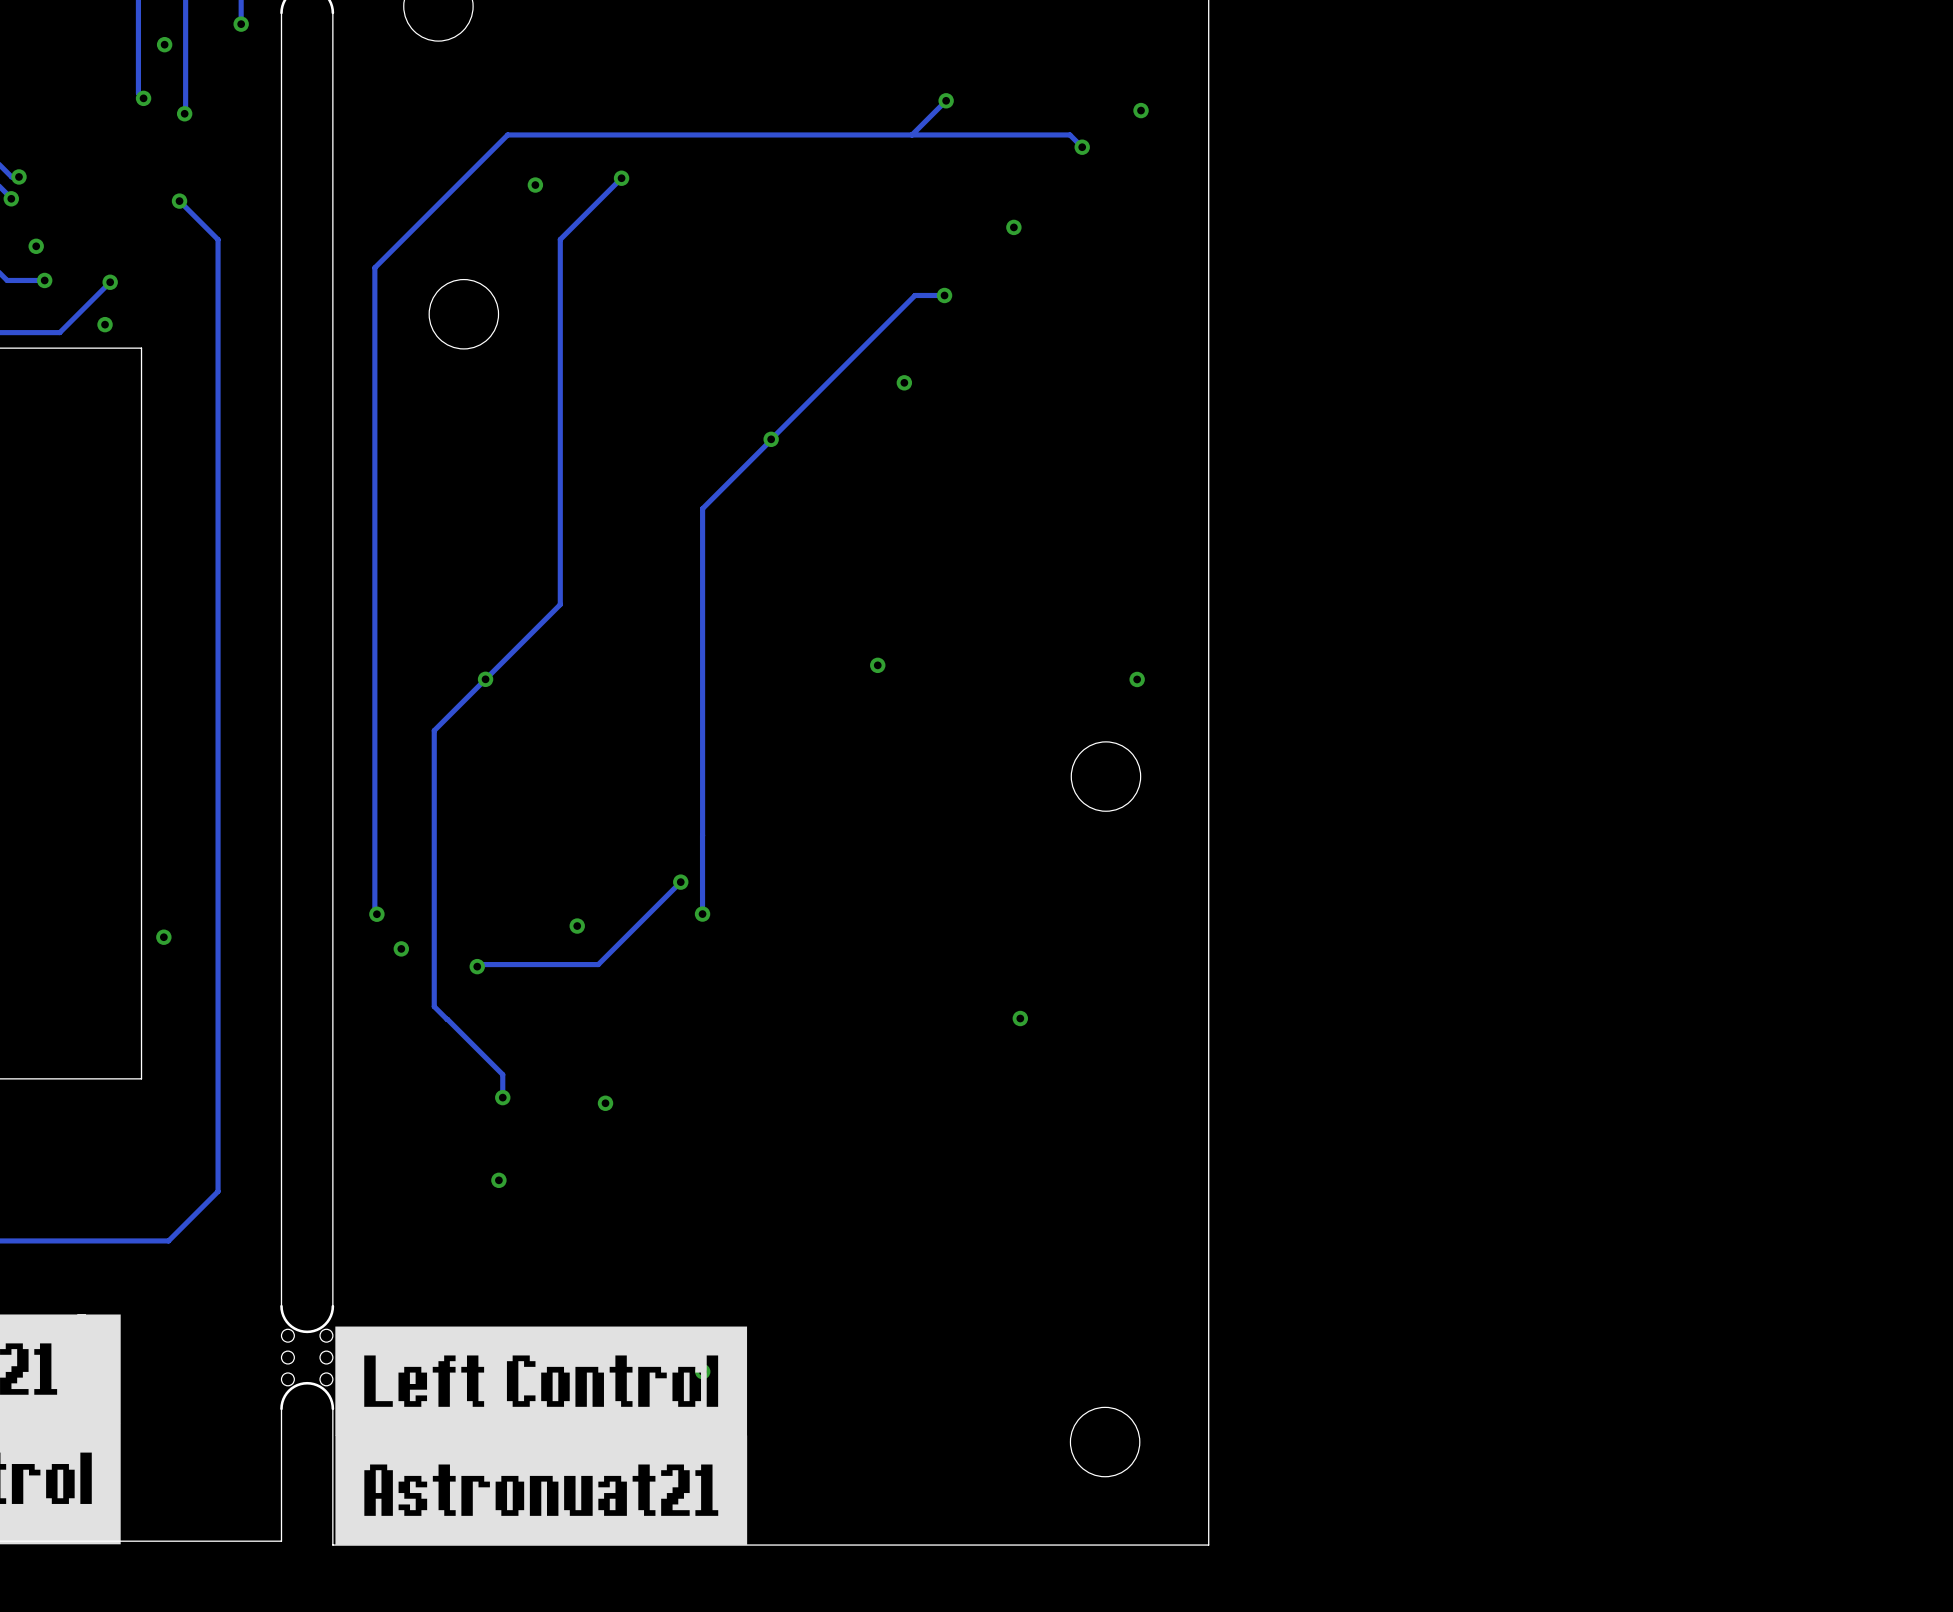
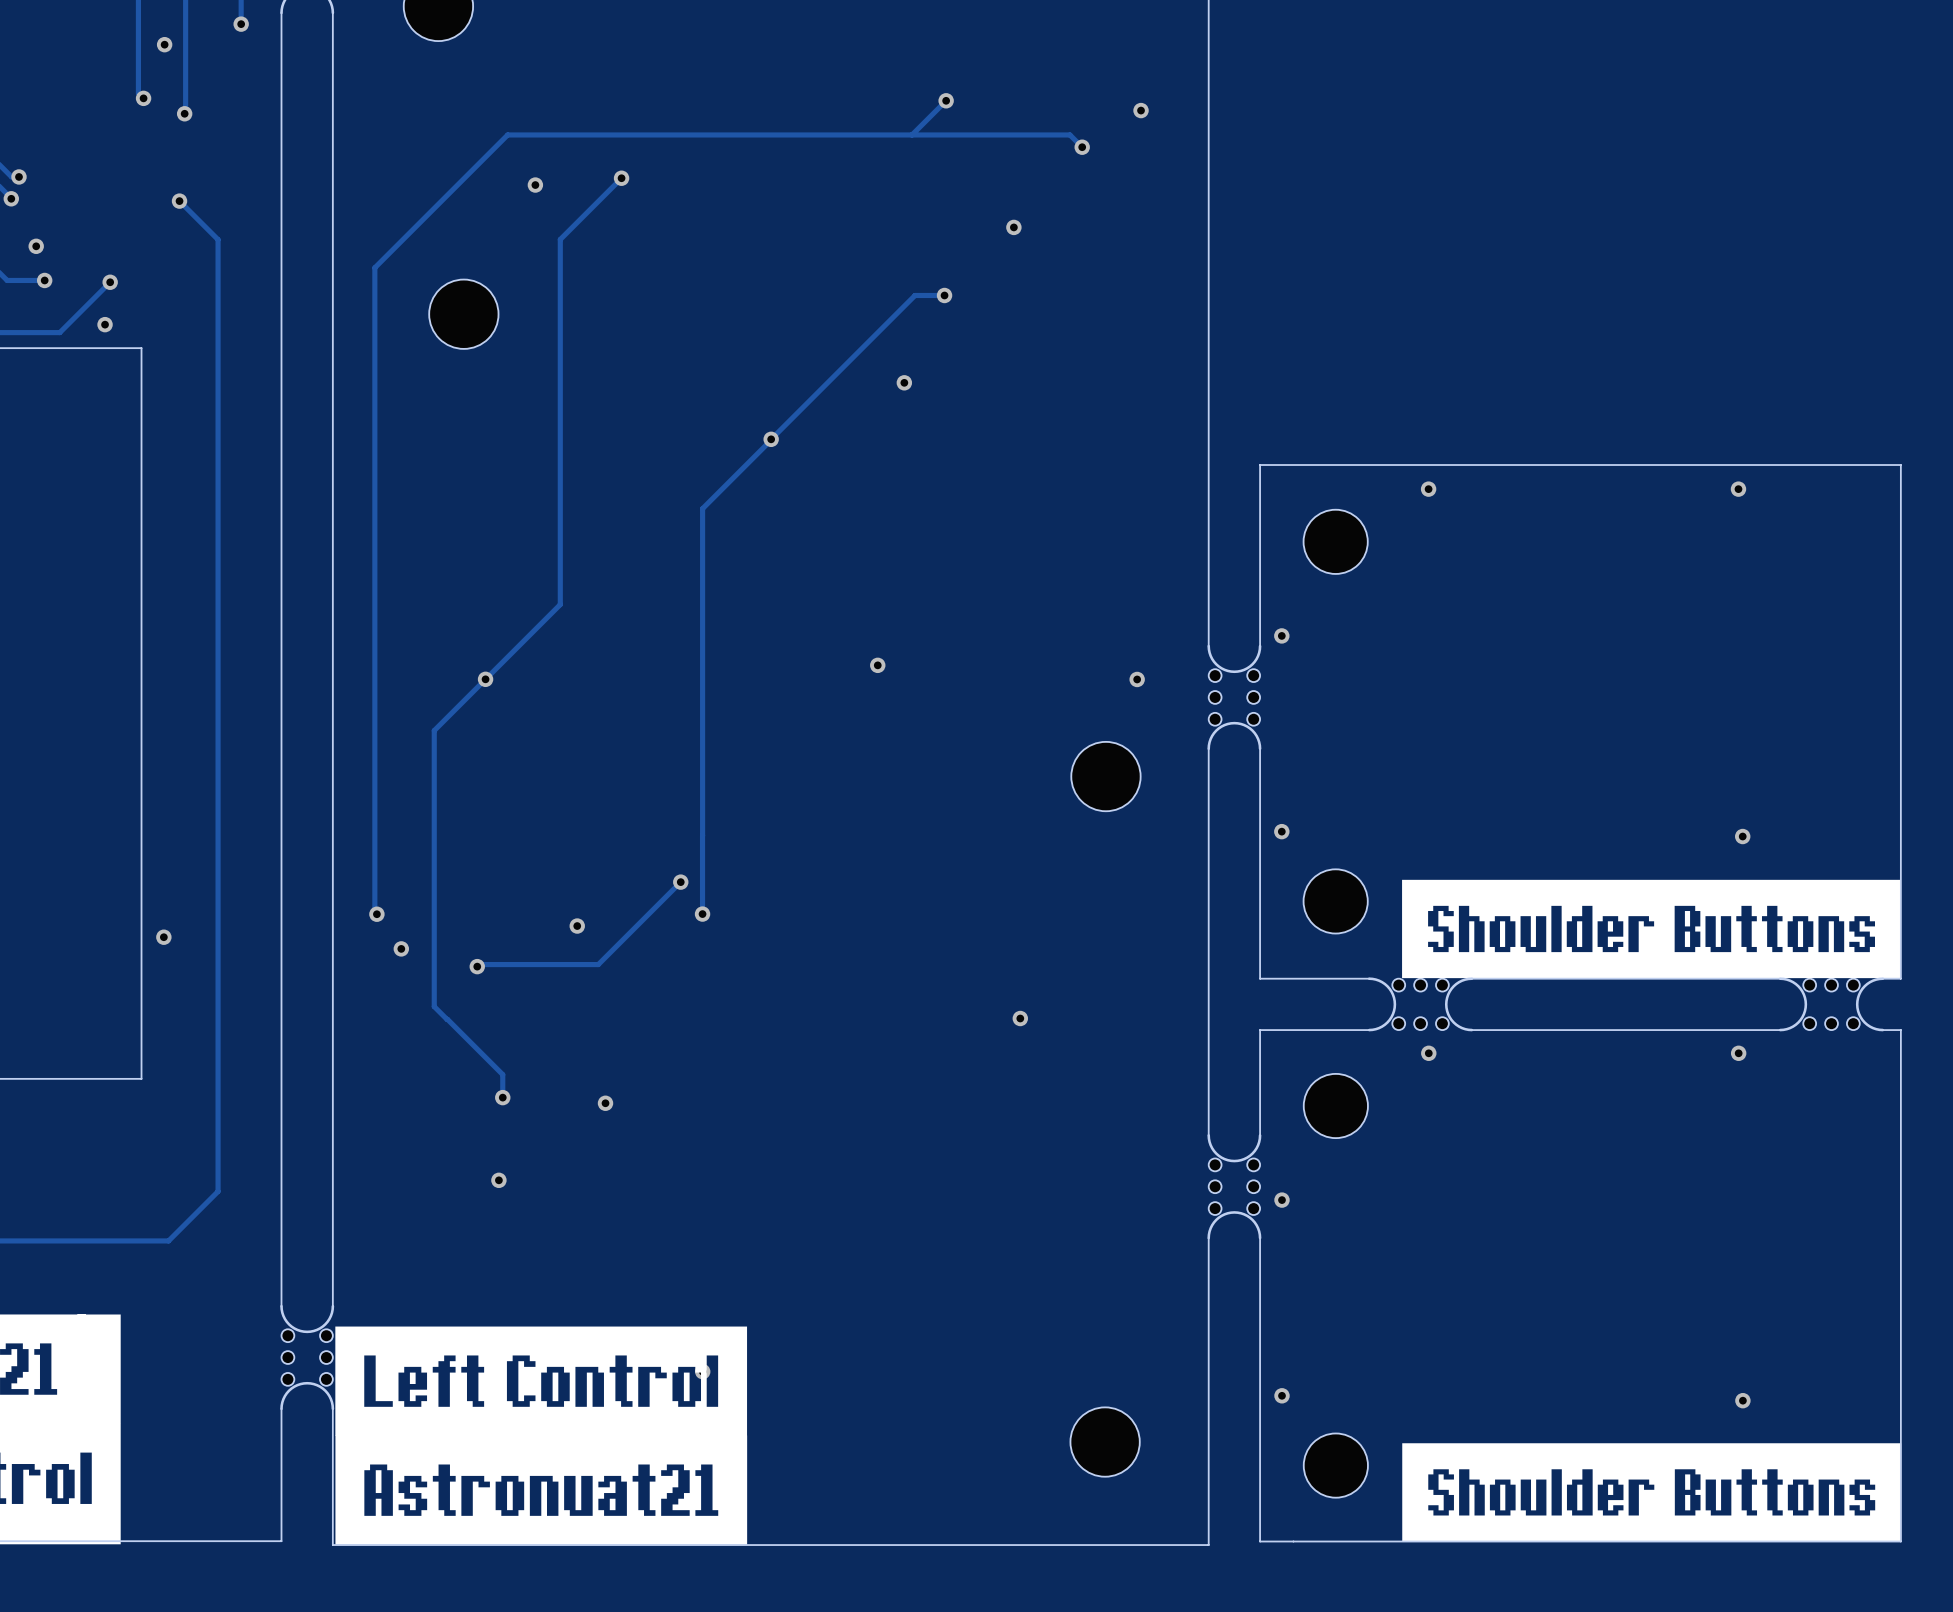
via: none -> (1428, 489)
via: none -> (1738, 489)
part: none -> (1335, 541)
via: none -> (1281, 635)
board edge: (1208, 646) (1208, 748) -> none
board edge: none -> (1260, 646) (1260, 465) (1900, 465) (1900, 978) (1882, 978)
part: none -> (1234, 697)
board edge: none -> (1260, 748) (1260, 978) (1369, 978)
via: none -> (1281, 831)
via: none -> (1742, 836)
drawing: none -> [1402, 879, 1902, 979]
part: none -> (1335, 901)
board edge: none -> (1780, 978) (1471, 978)
part: none -> (1420, 1004)
part: none -> (1831, 1004)
board edge: none -> (1369, 1030) (1260, 1030) (1260, 1135)
board edge: none -> (1780, 1030) (1471, 1030)
board edge: none -> (1882, 1030) (1900, 1030) (1900, 1541) (1260, 1541) (1260, 1238)
via: none -> (1428, 1053)
via: none -> (1738, 1053)
part: none -> (1335, 1106)
board edge: (1208, 1135) (1208, 1238) -> none
part: none -> (1234, 1186)
via: none -> (1282, 1200)
via: none -> (1282, 1395)
via: none -> (1742, 1400)
drawing: none -> [1402, 1443, 1902, 1542]
part: none -> (1335, 1465)

